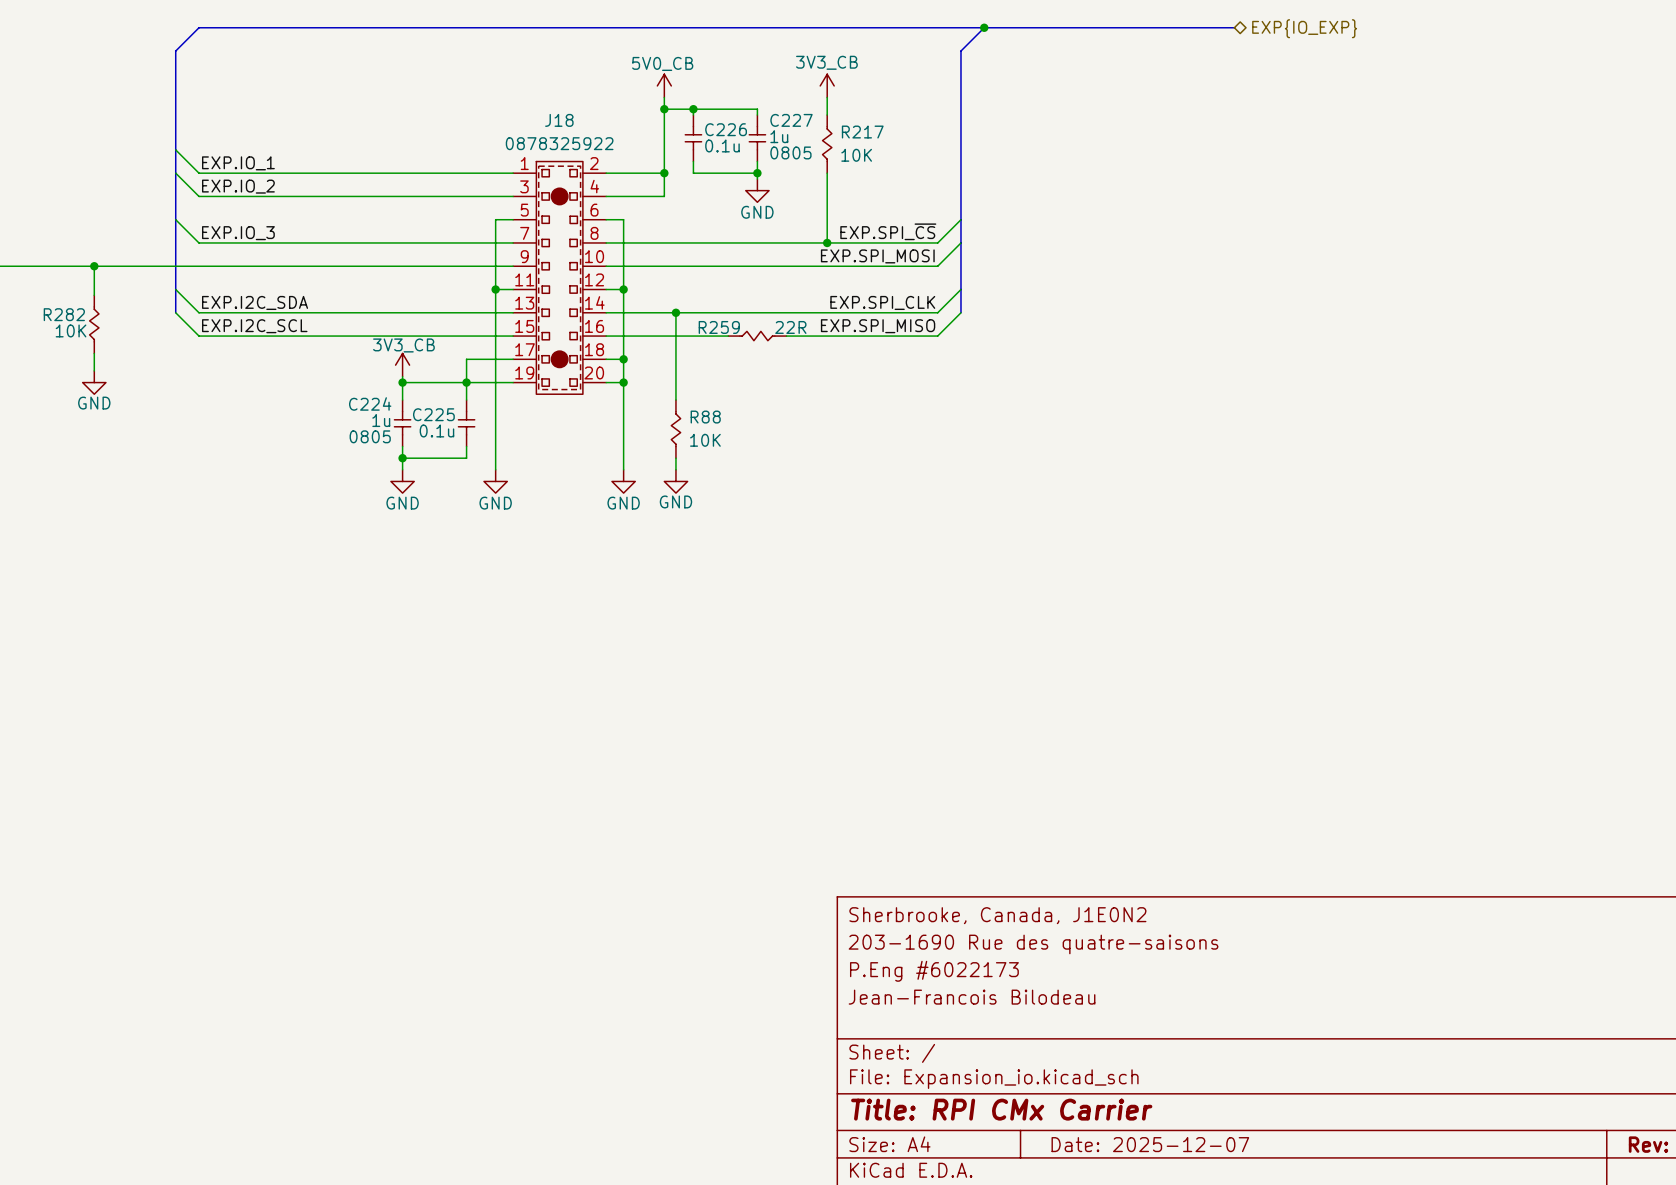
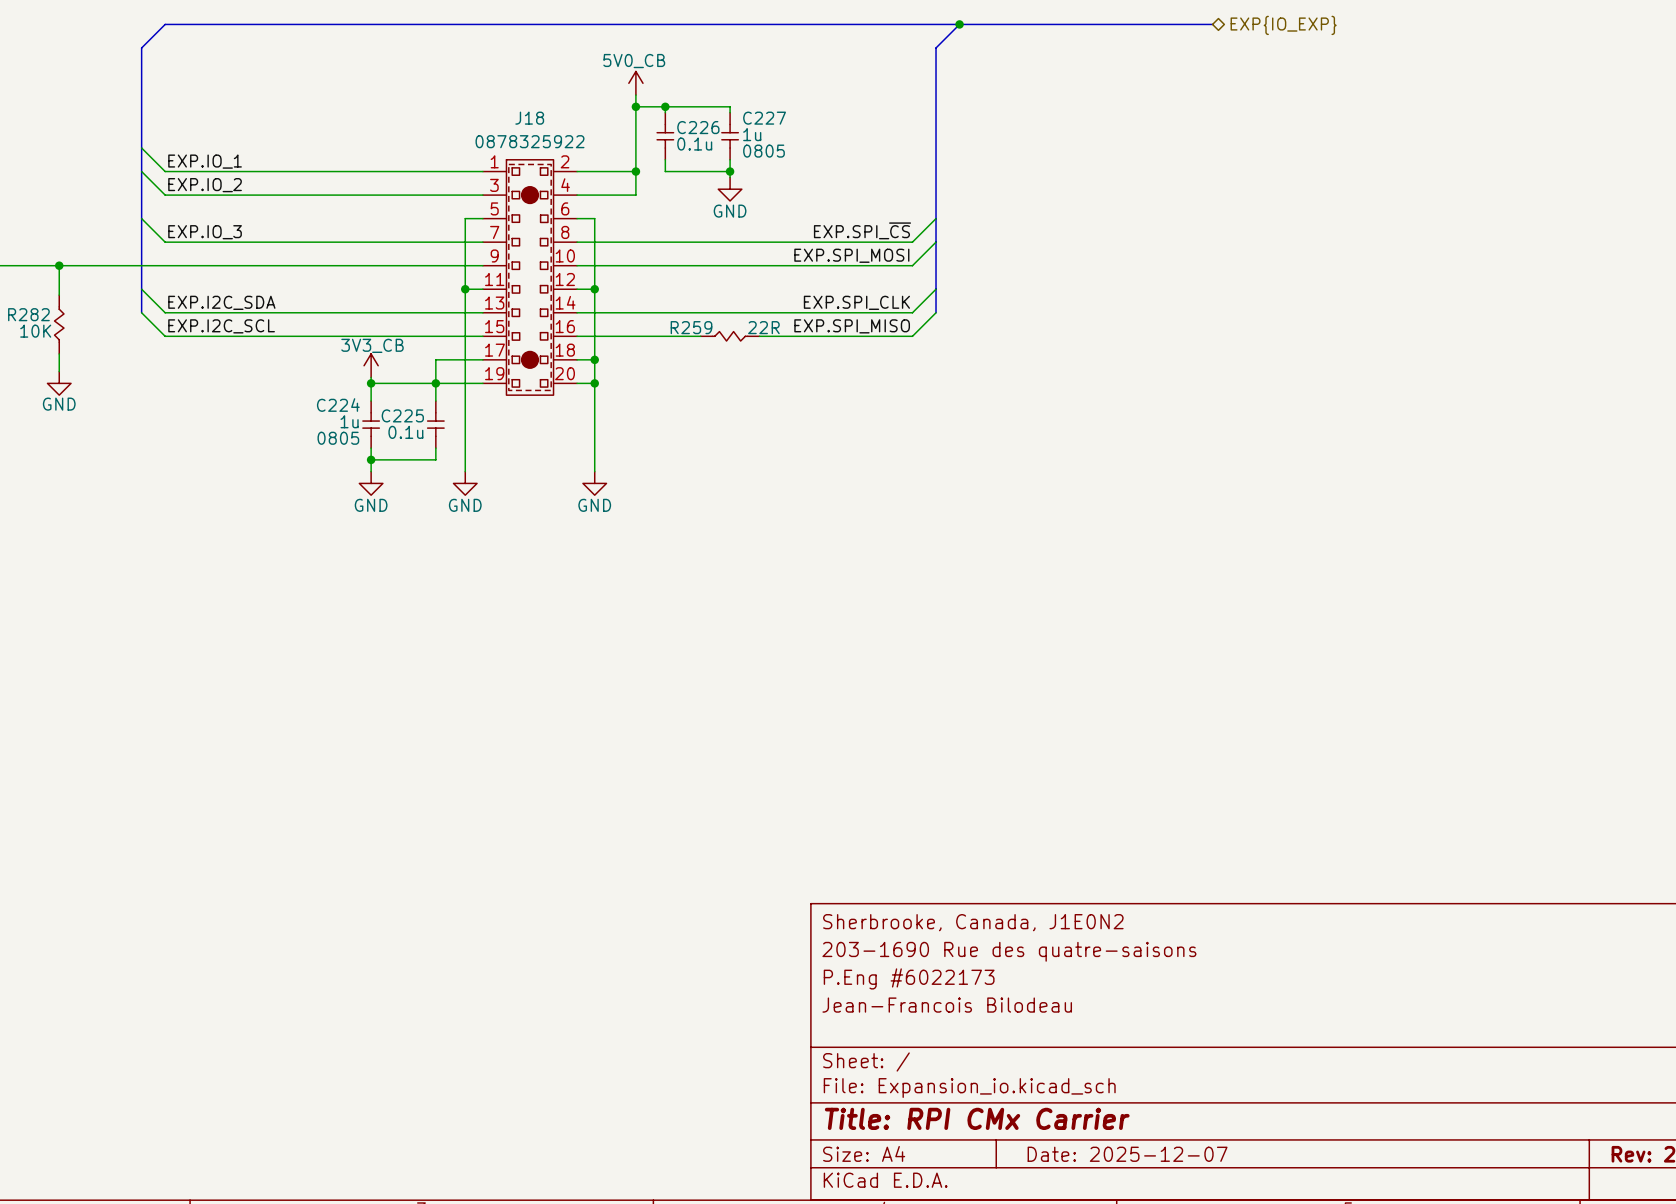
power symbol: 3V3_CB (827, 85) -> none
wire: (827, 97) (827, 115) -> none
R217: 10K (827, 144) -> none
wire: (827, 173) (827, 242) -> none
junction: (827, 242) -> none
wire: (675, 312) (675, 400) -> none
junction: (675, 312) -> none
R88: 10K (675, 429) -> none
wire: (675, 458) (675, 469) -> none
power symbol: GND (675, 481) -> none

